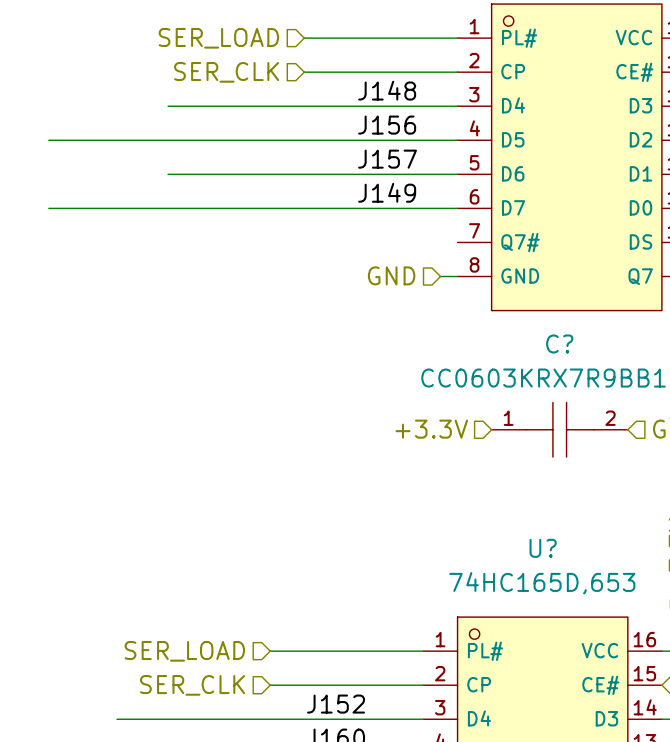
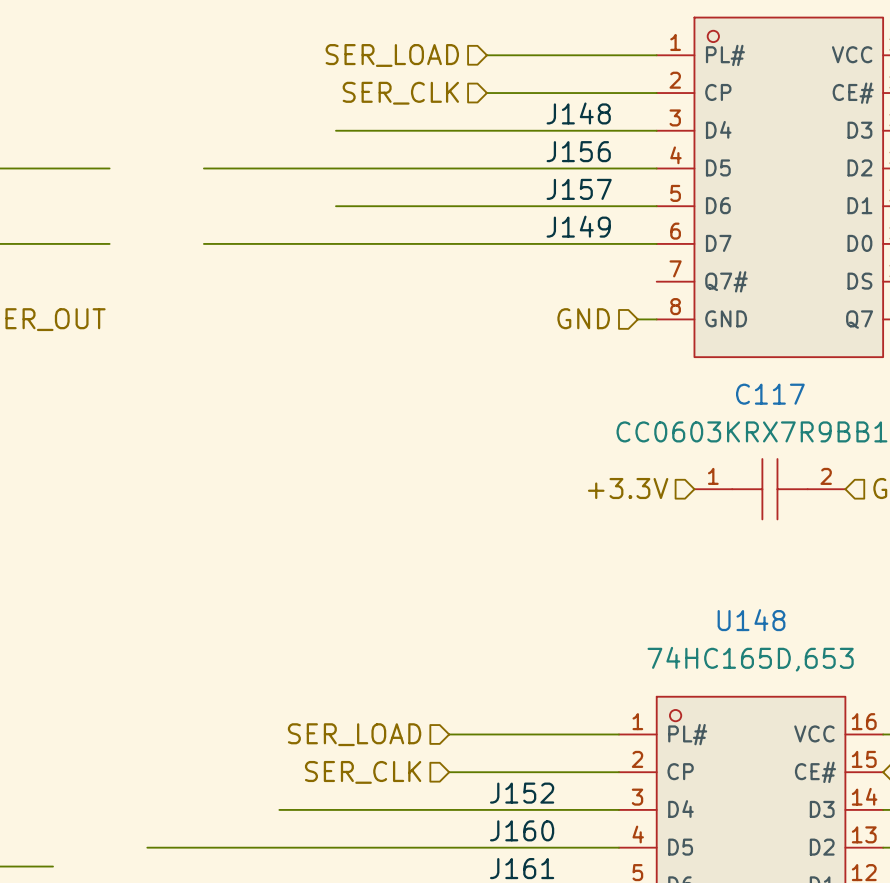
C? name: C? (559, 343) -> C117 (770, 394)
U? name: U? (543, 548) -> U148 (751, 620)

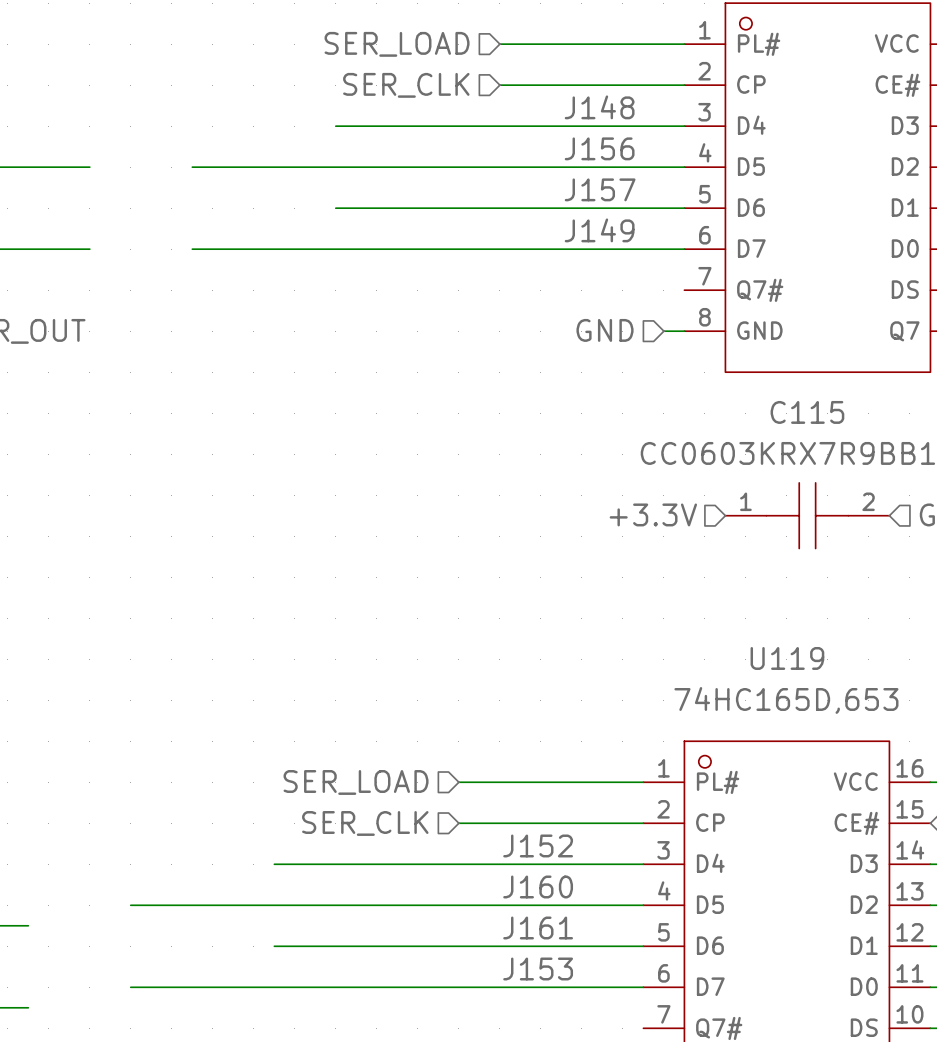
C117 name: C117 (770, 394) -> C115 (807, 412)
U148 name: U148 (751, 620) -> U119 (787, 658)

